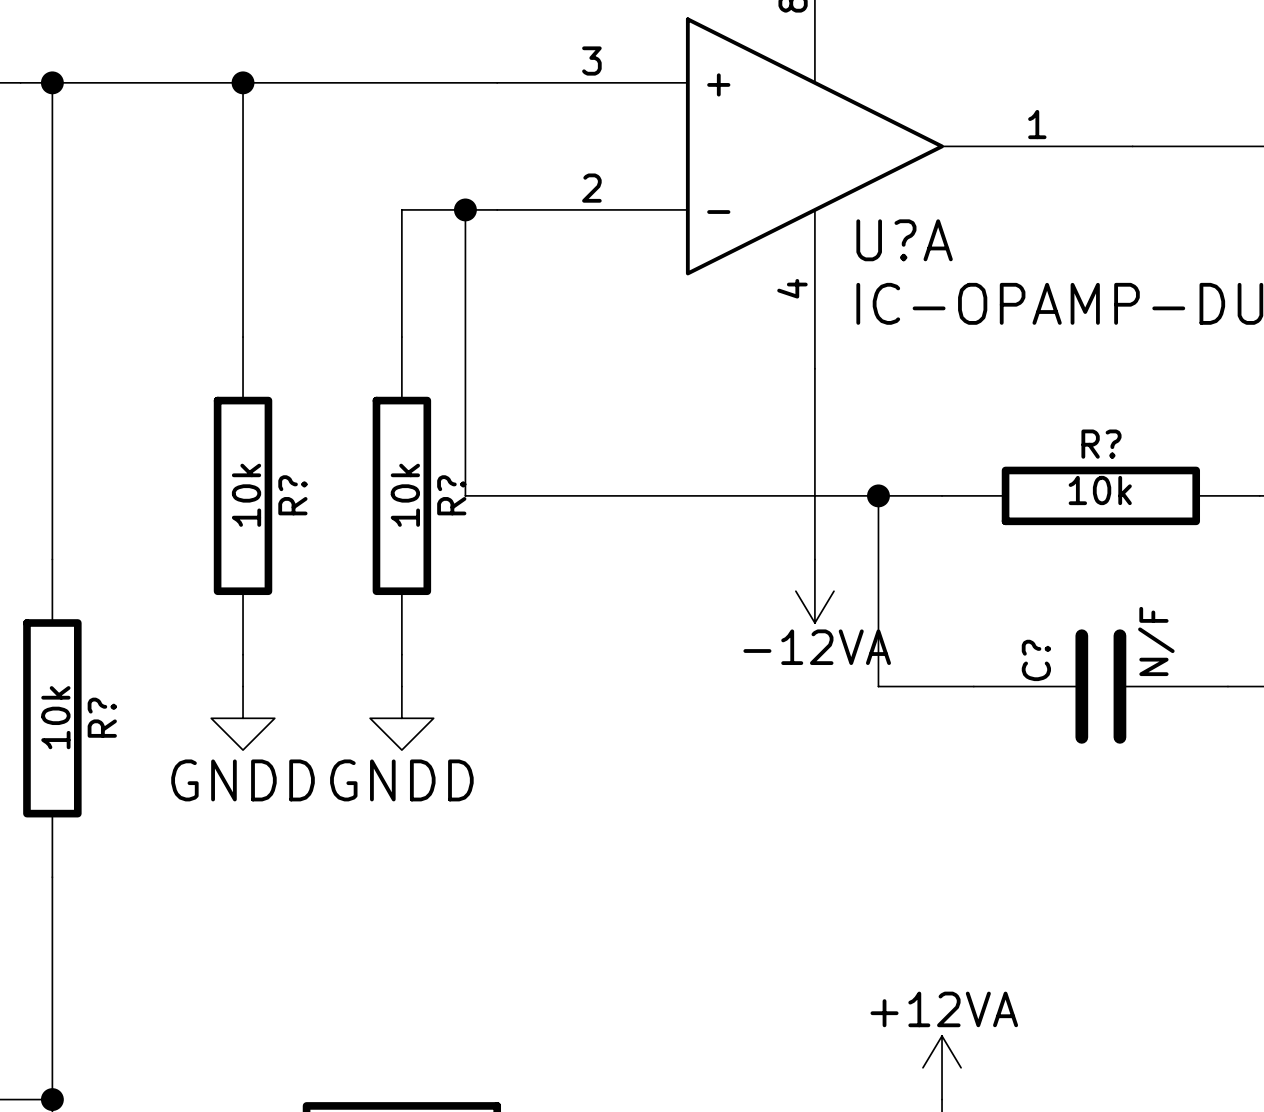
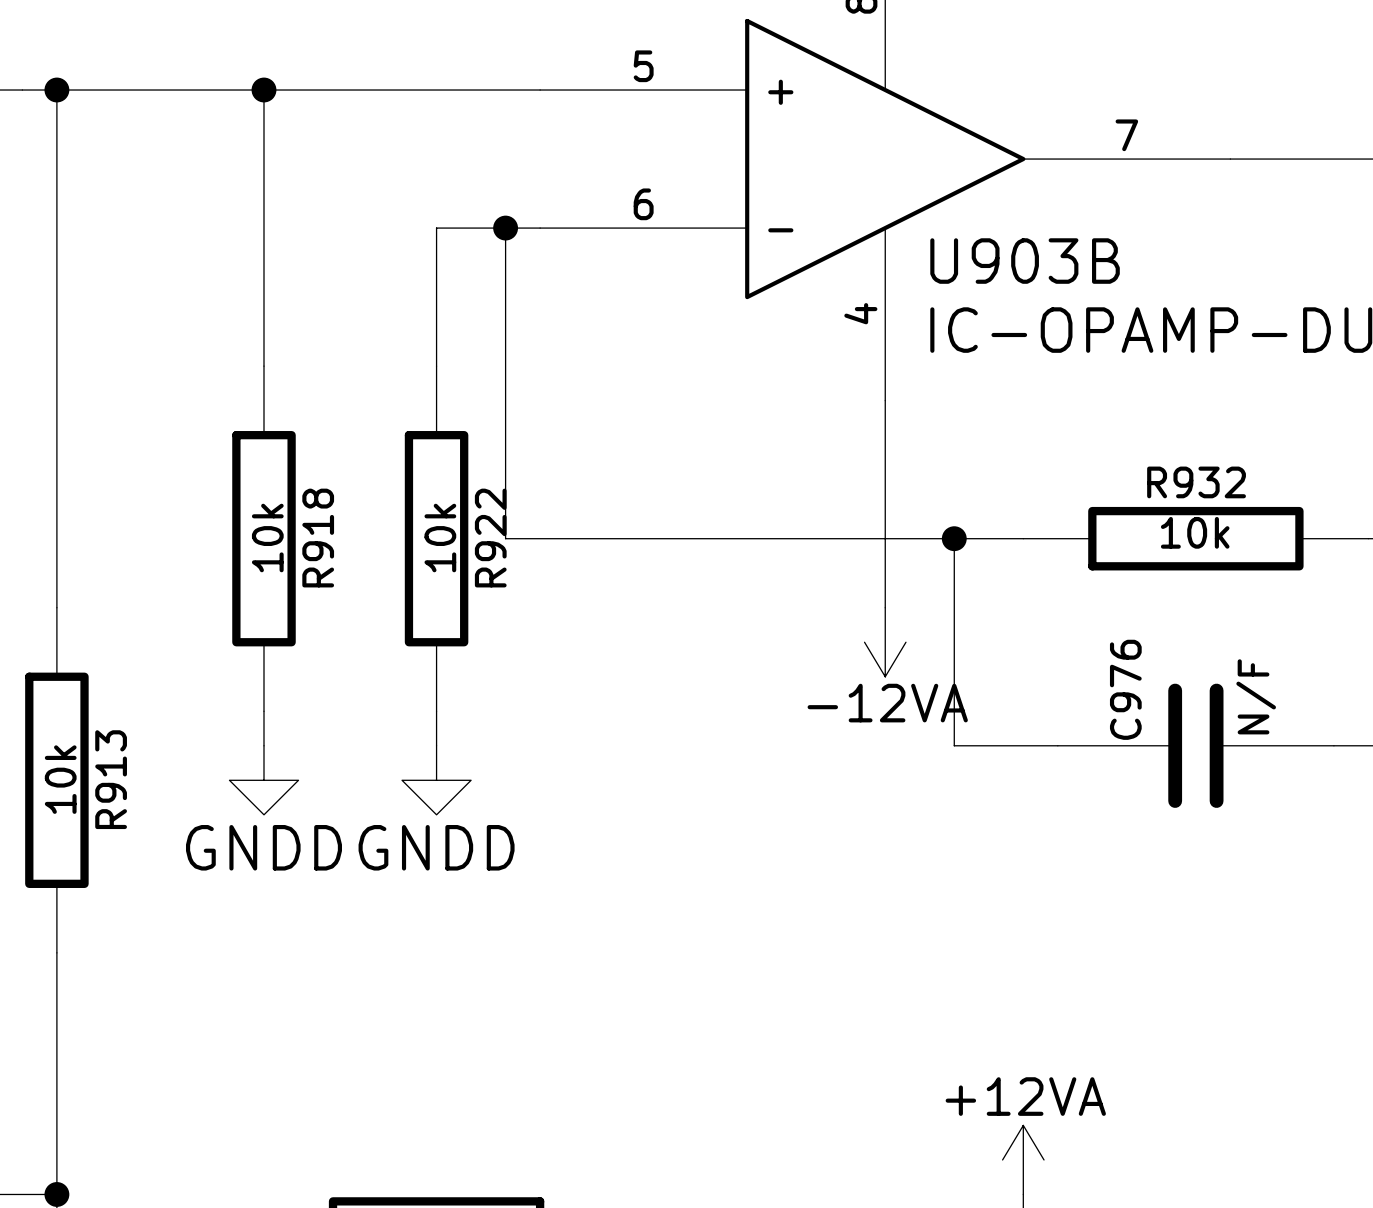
U?A pin number: 3 (591, 61) -> 5 (643, 66)
U?A pin number: 1 (1037, 124) -> 7 (1126, 135)
U?A pin number: 2 (591, 188) -> 6 (643, 204)
U?A name: U?A (904, 240) -> U903B (1025, 261)
R? name: R? (1101, 444) -> R932 (1196, 482)
R? name: R? (292, 495) -> R918 (318, 538)
R? name: R? (451, 495) -> R922 (490, 538)
C? name: C? (1036, 660) -> C976 (1125, 689)
R? name: R? (102, 717) -> R913 (111, 779)

